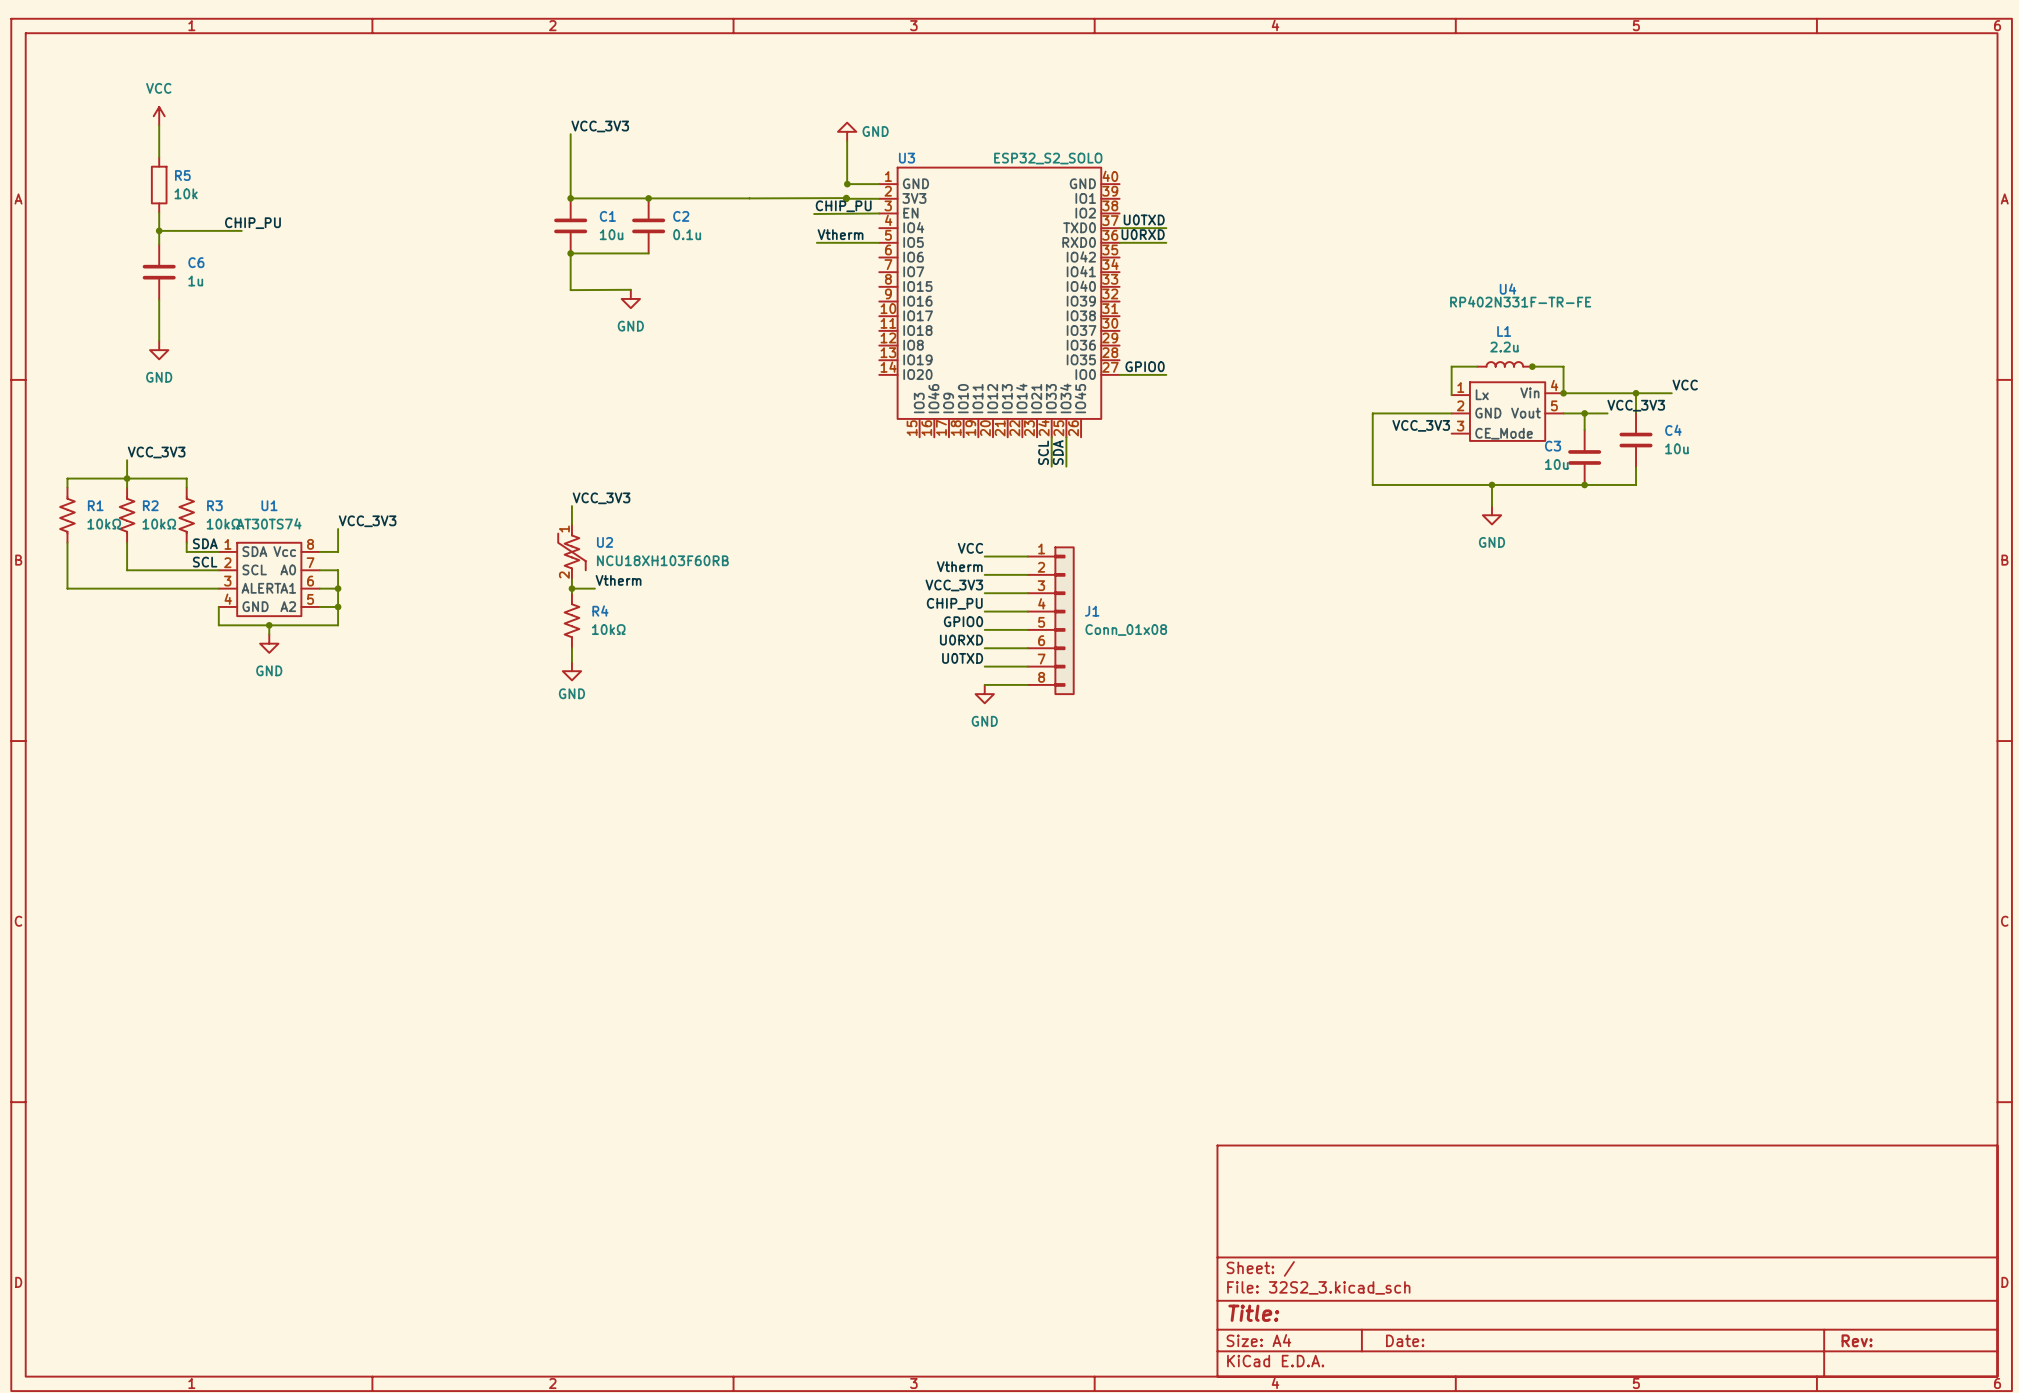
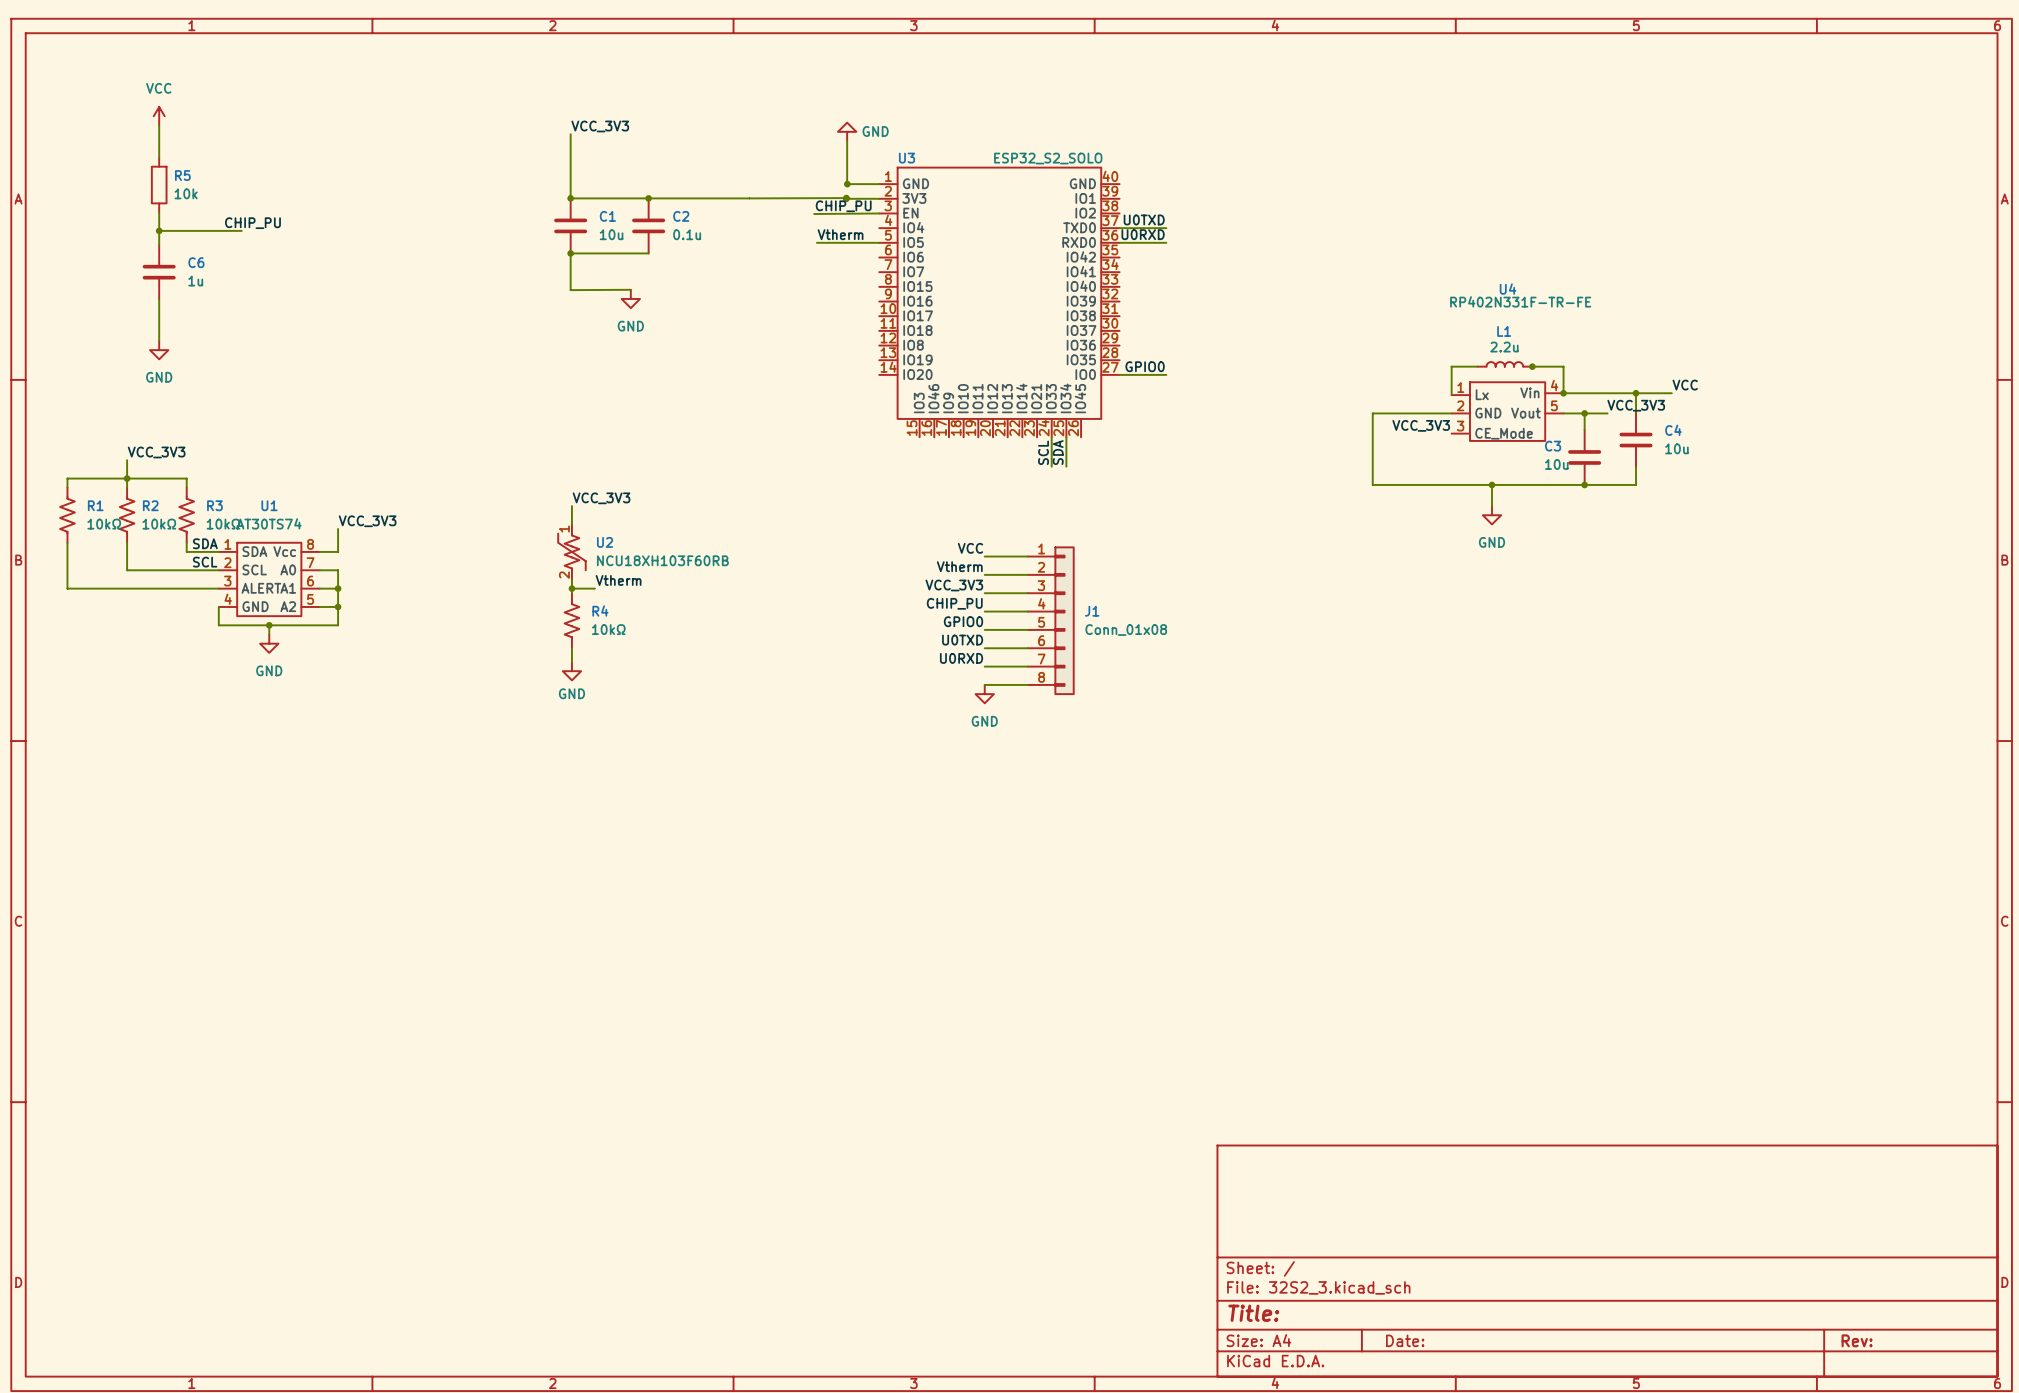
label: U0RXD (961, 640) -> U0TXD (962, 640)
label: U0TXD (962, 658) -> U0RXD (961, 658)

